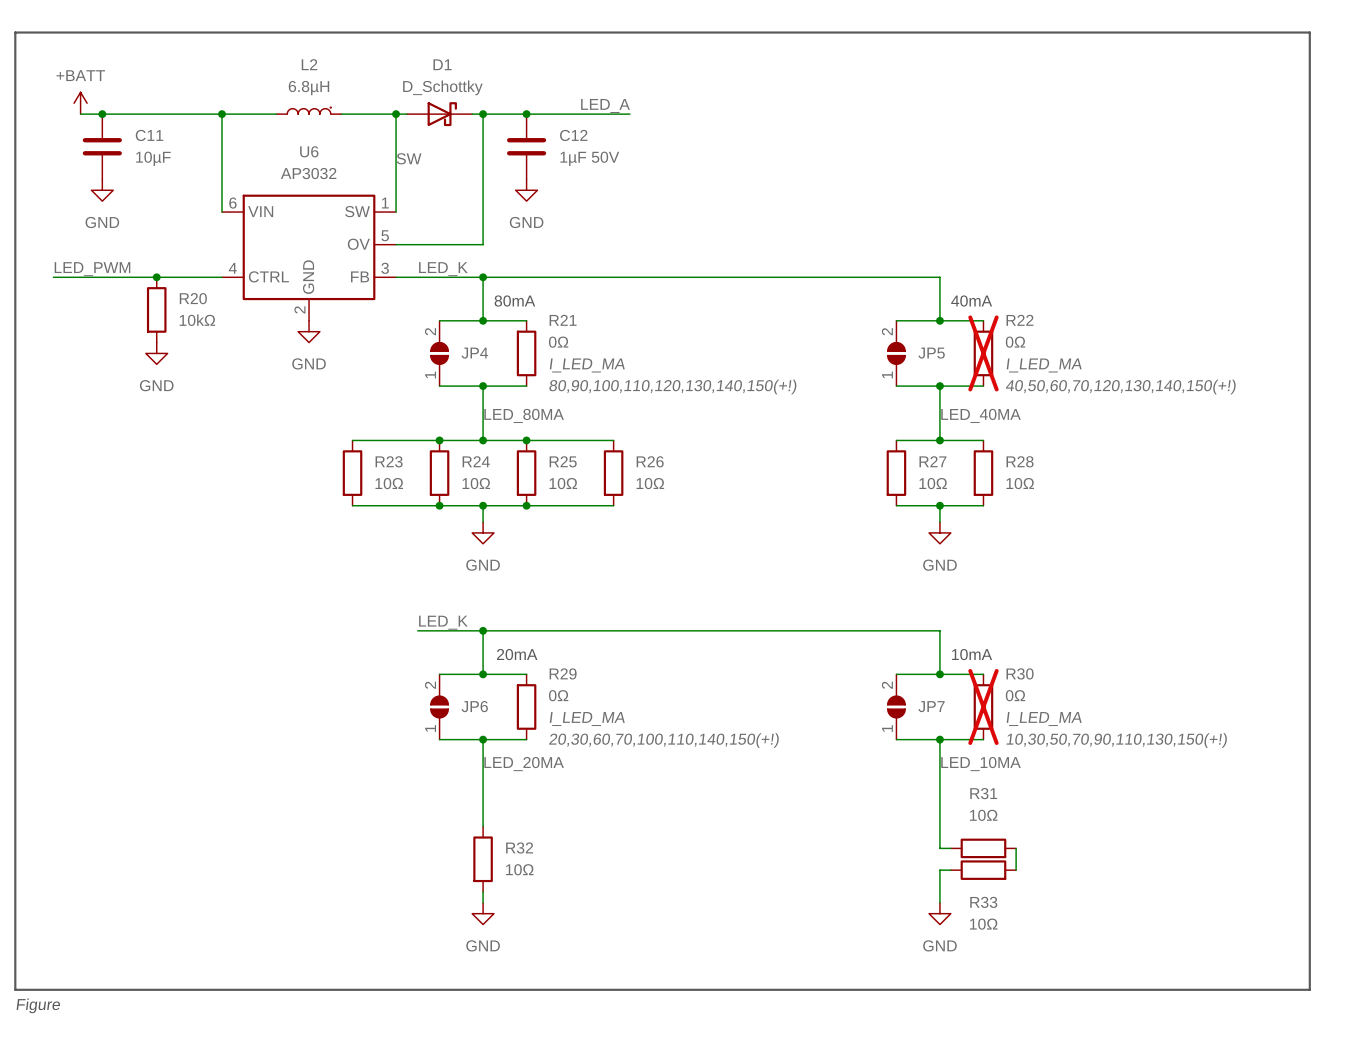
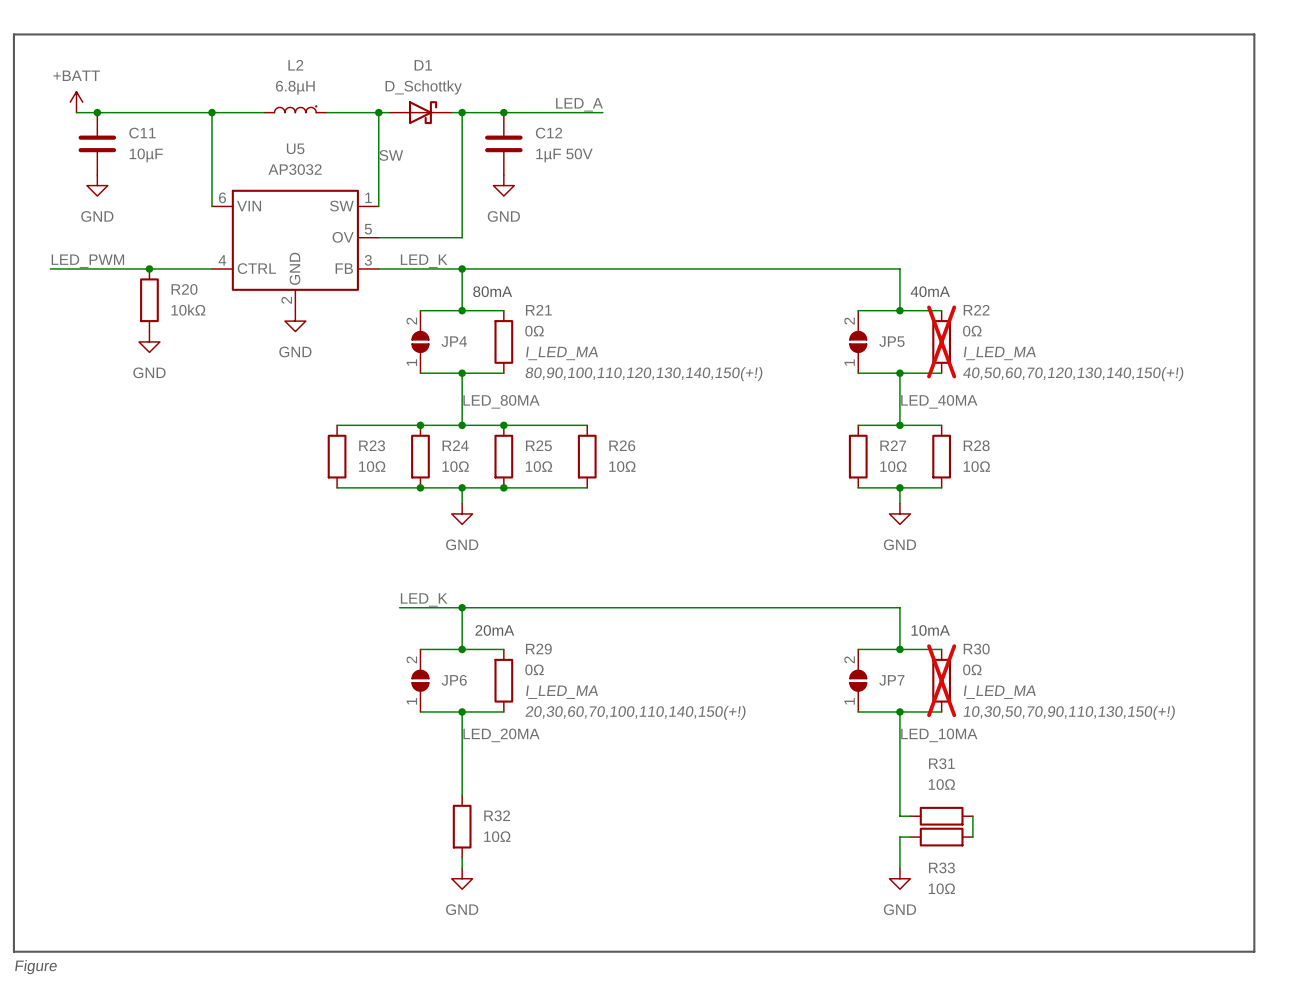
U6 name: U6 (309, 151) -> U5 (295, 148)

